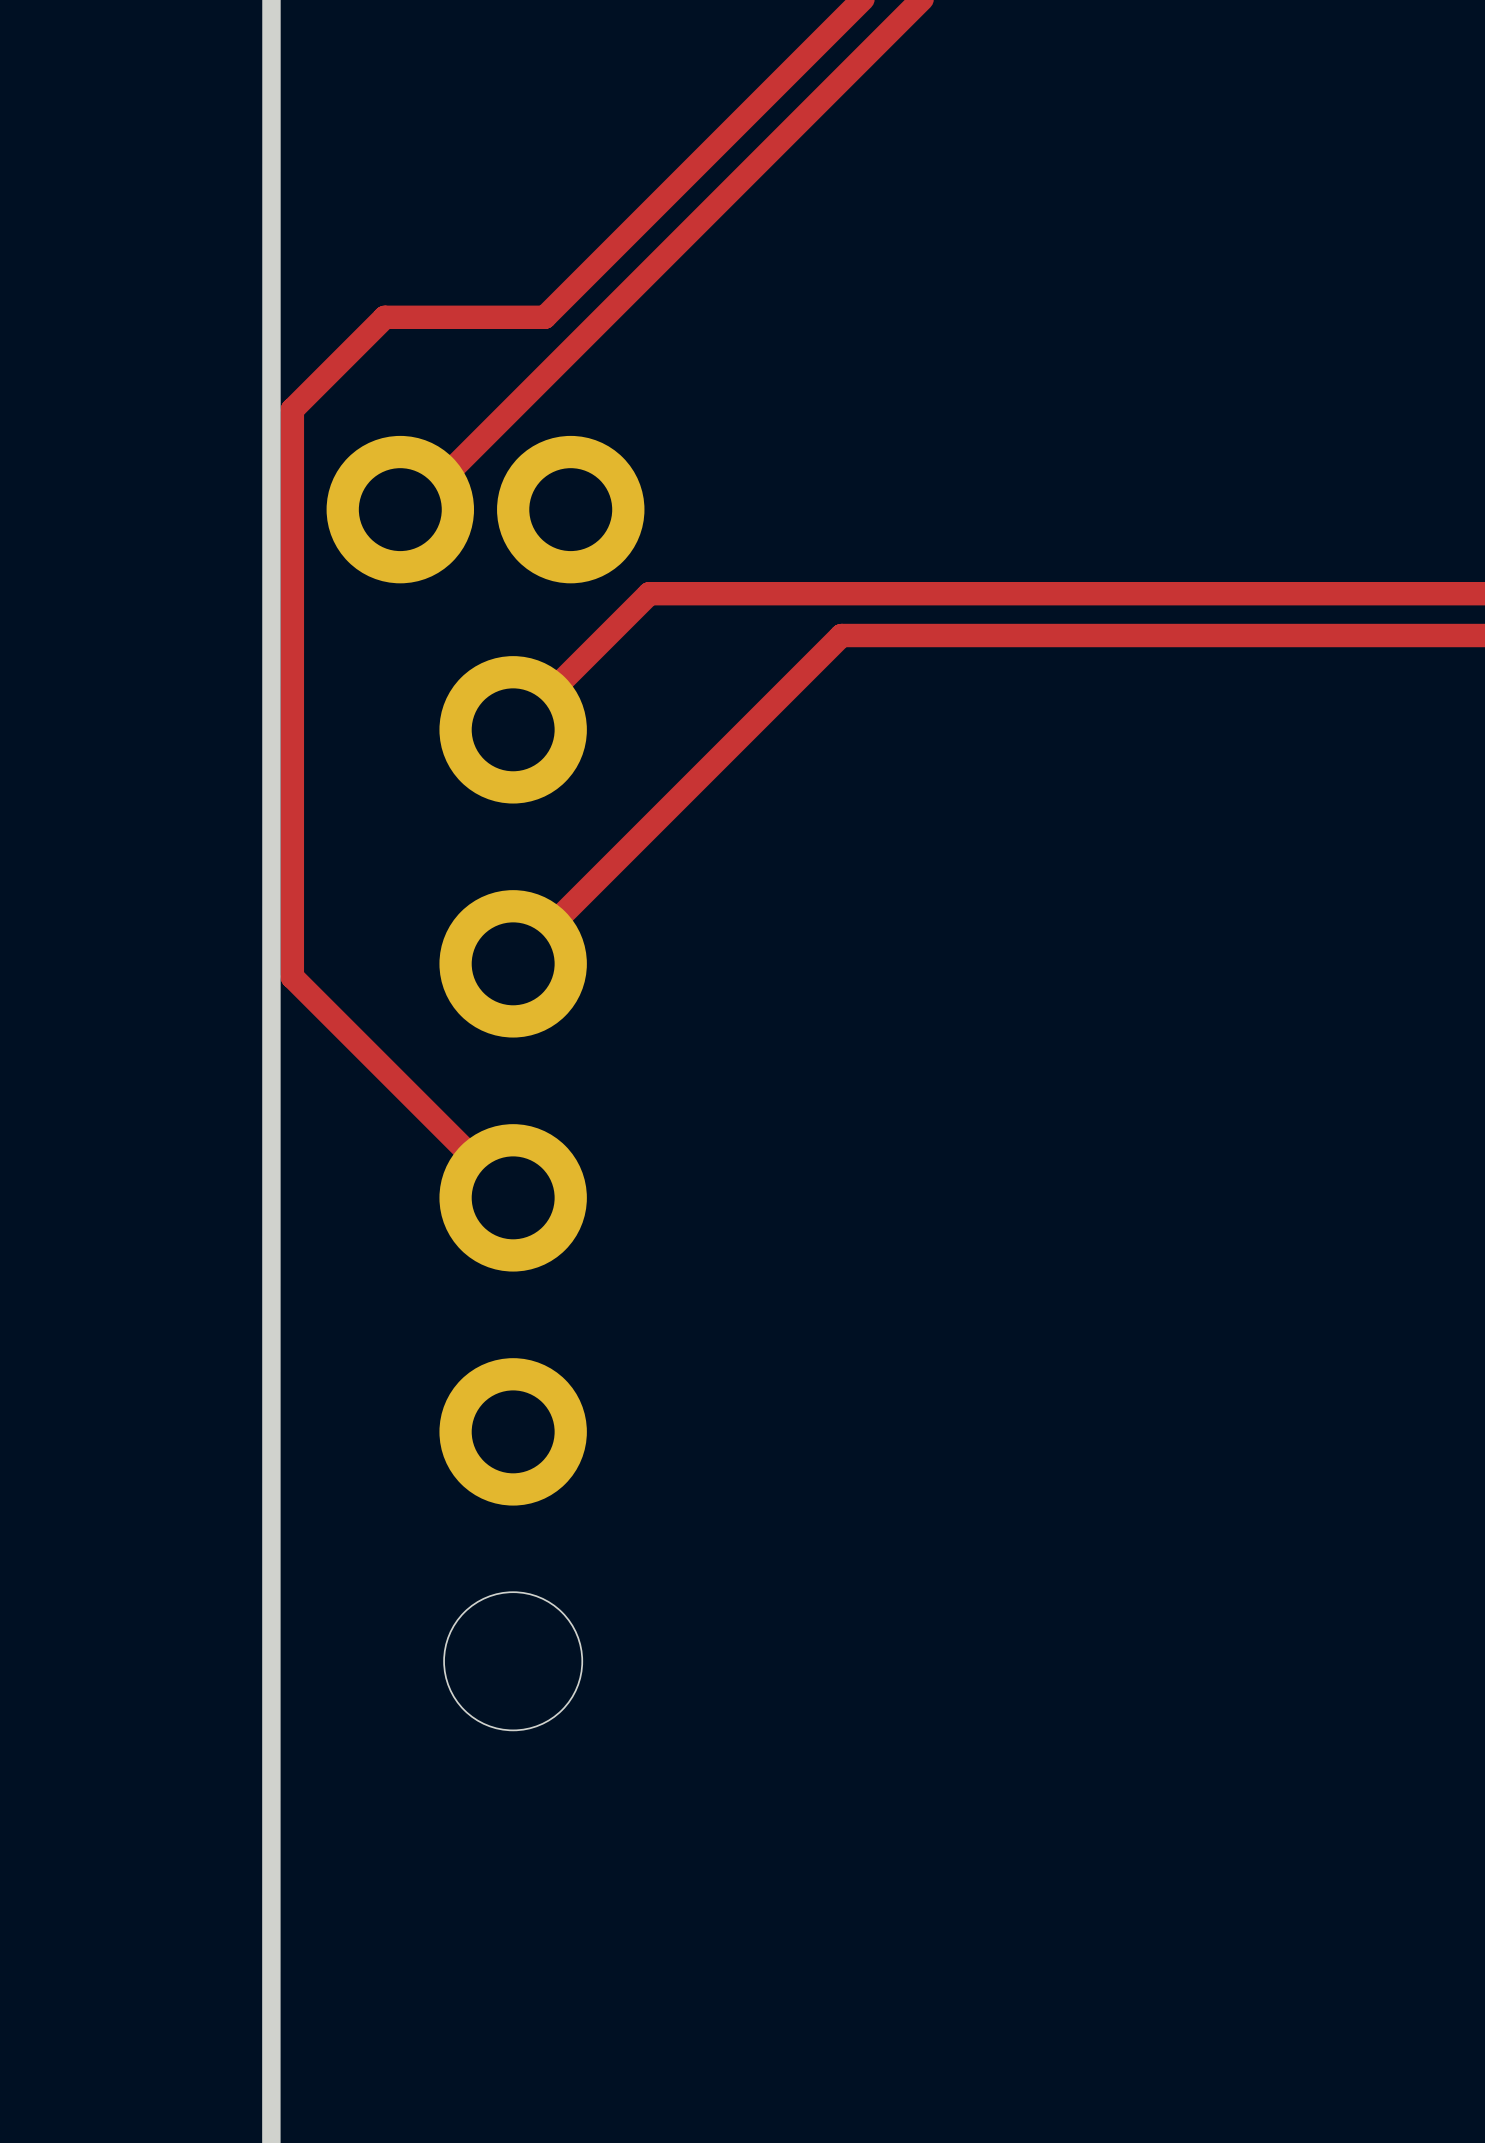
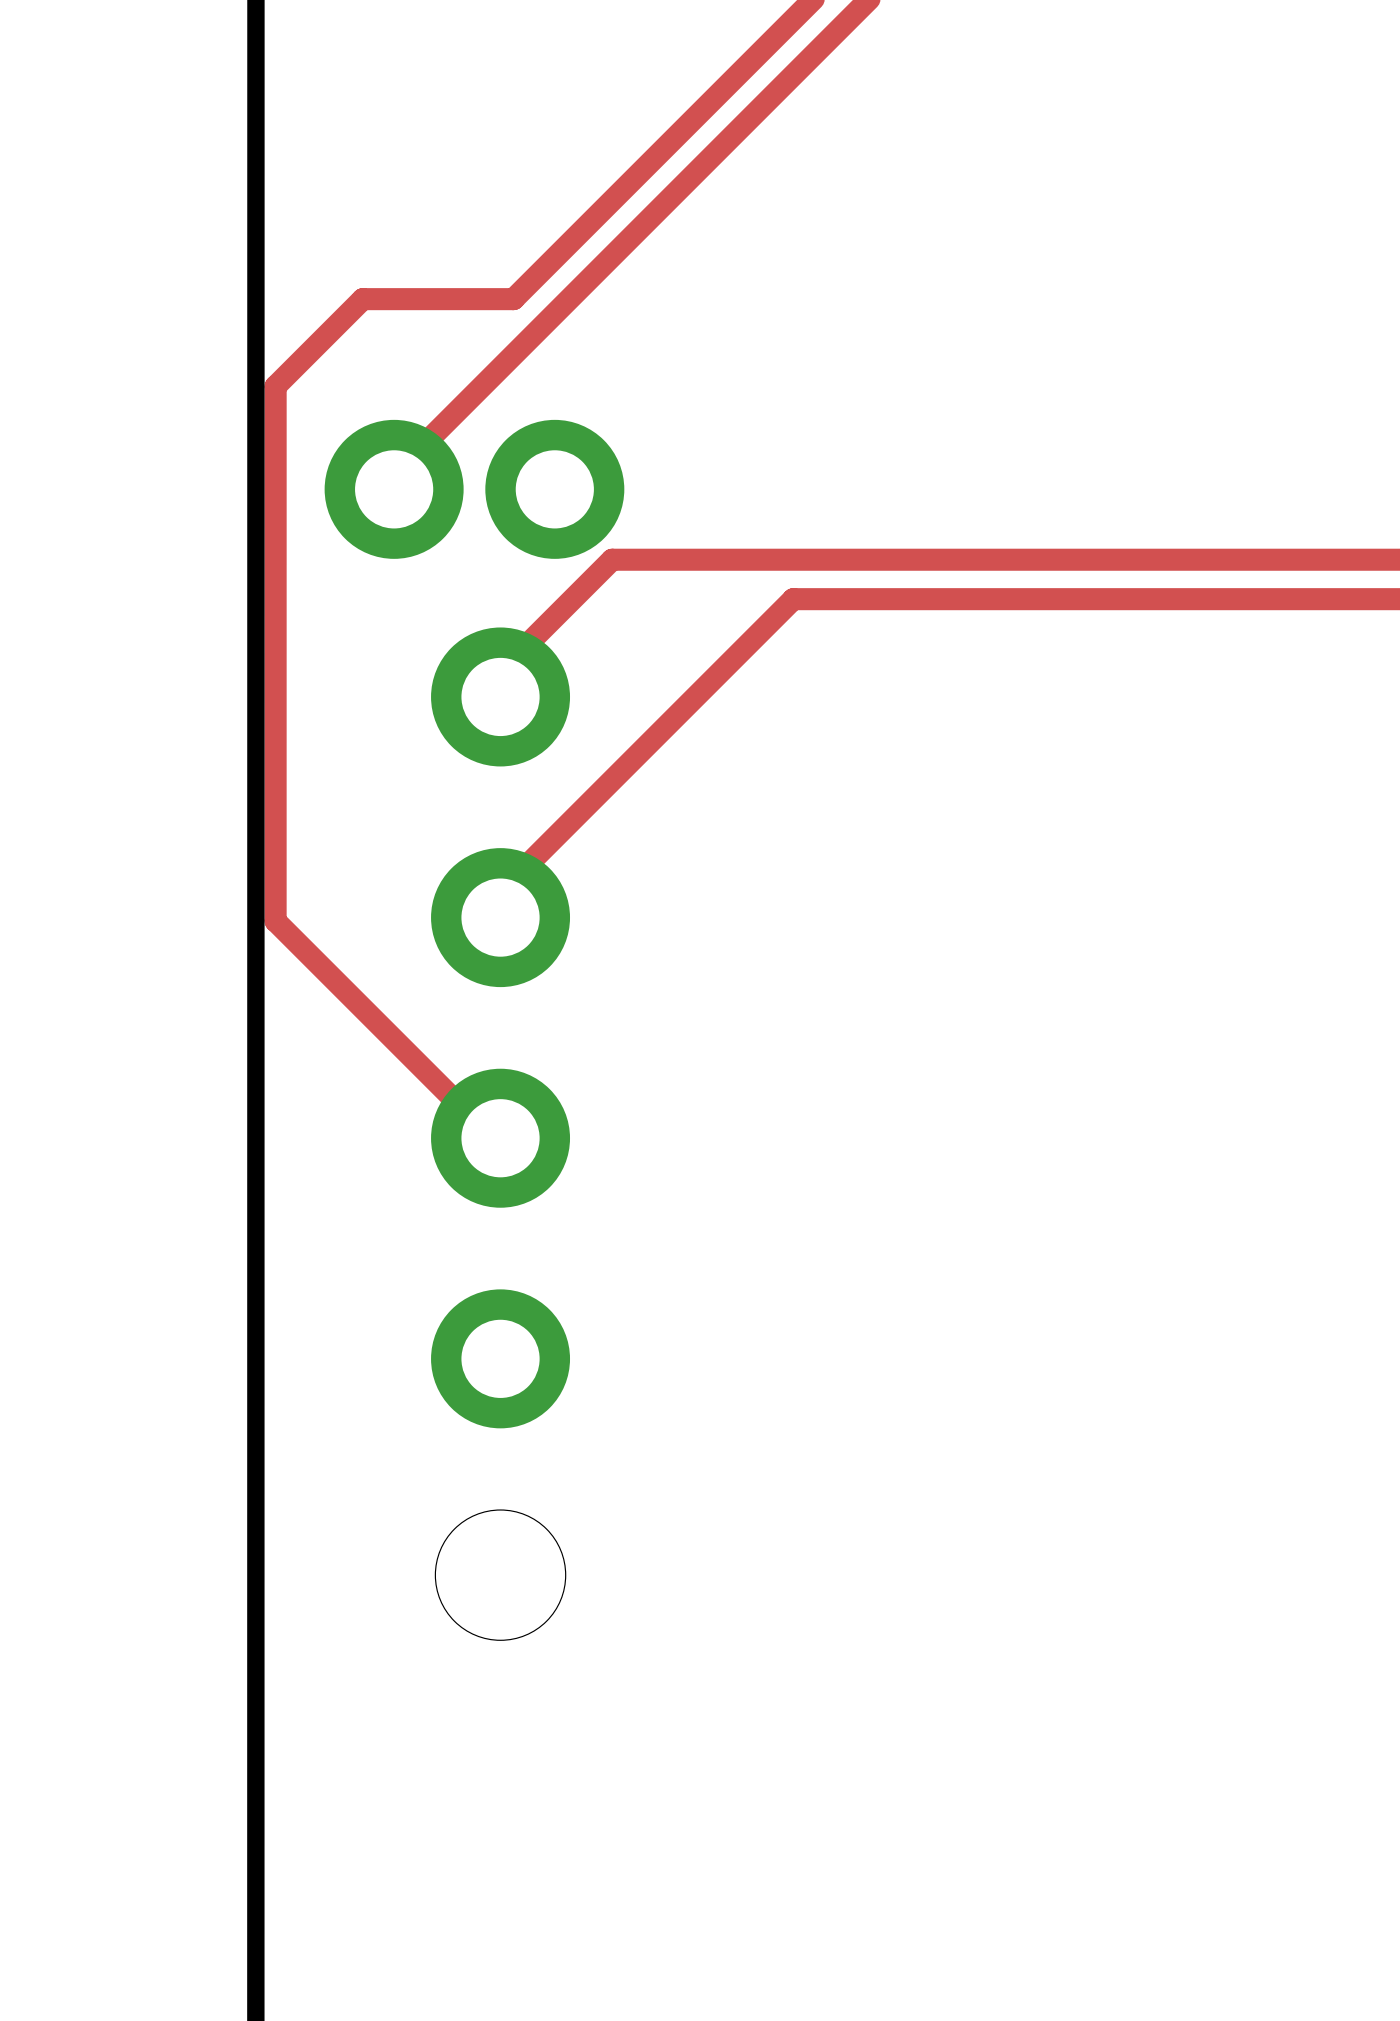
part position: (485, 1083) -> (474, 1030)

